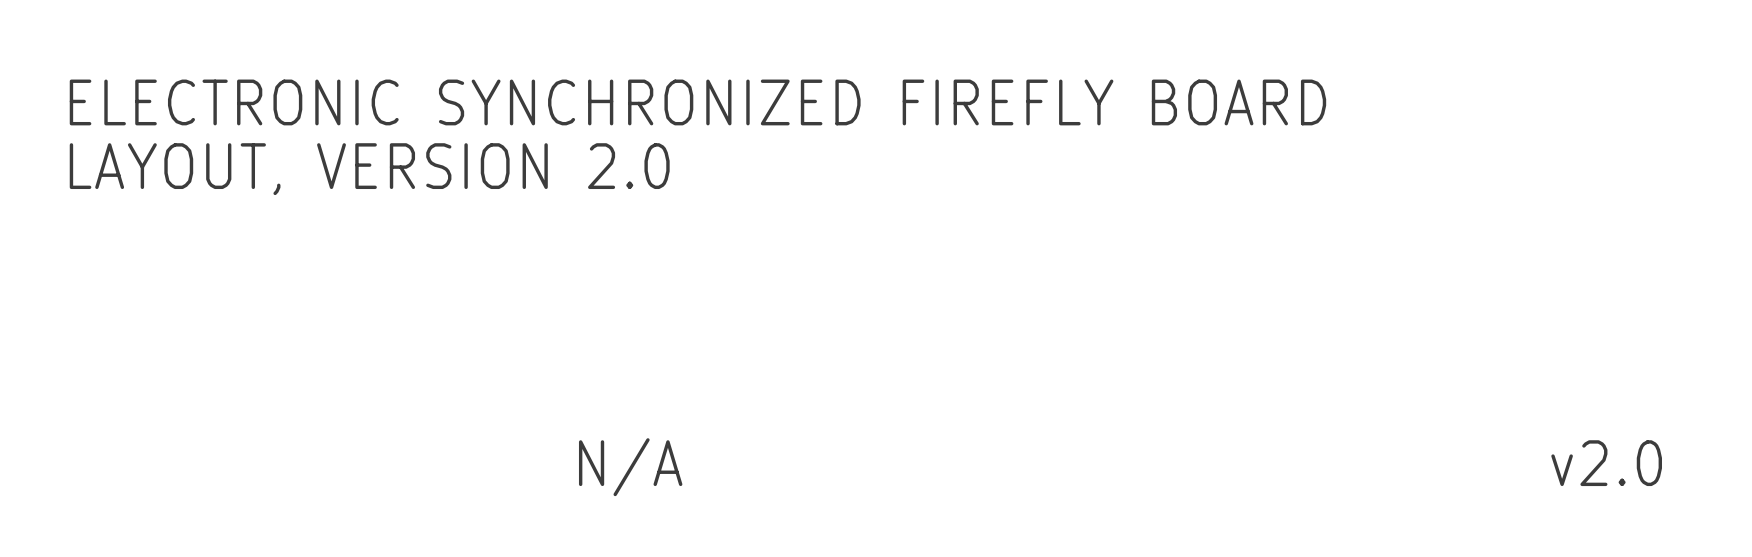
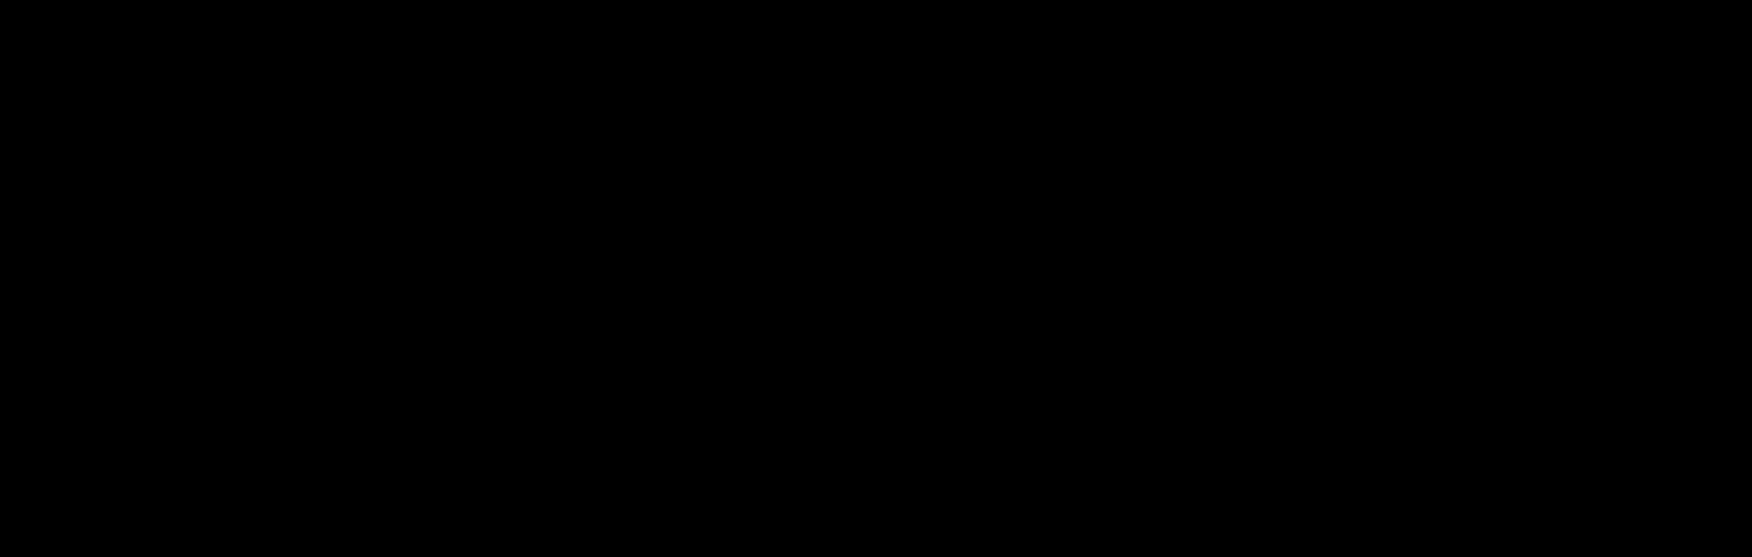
text: ELECTRONIC SYNCHRONIZED FIREFLY BOARD (697, 102) -> none
text: LAYOUT, VERSION 2.0 (369, 169) -> none
text: v2.0 (1606, 463) -> none
text: N/A (630, 467) -> none

